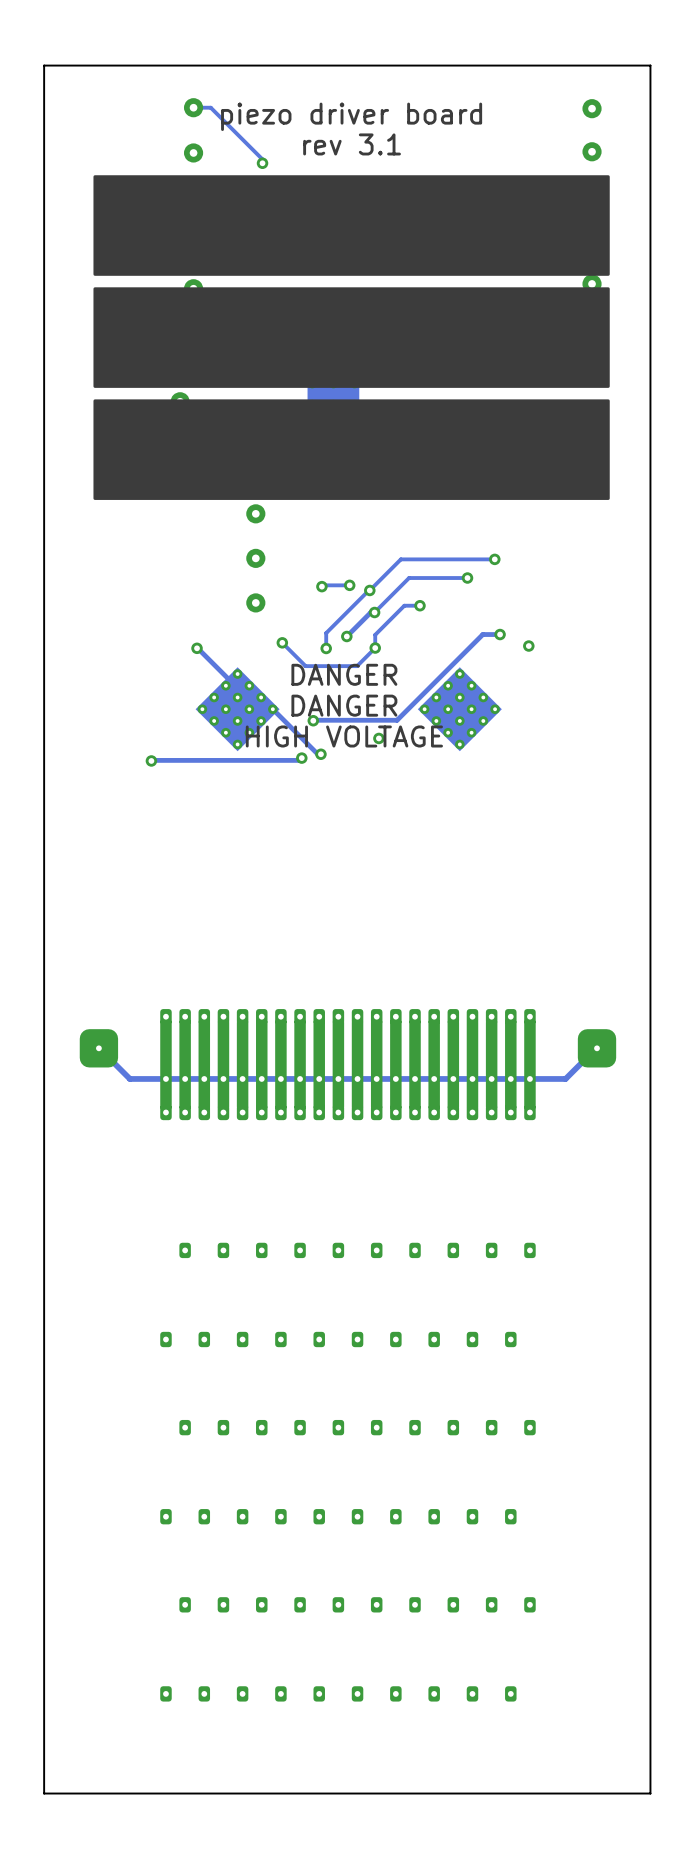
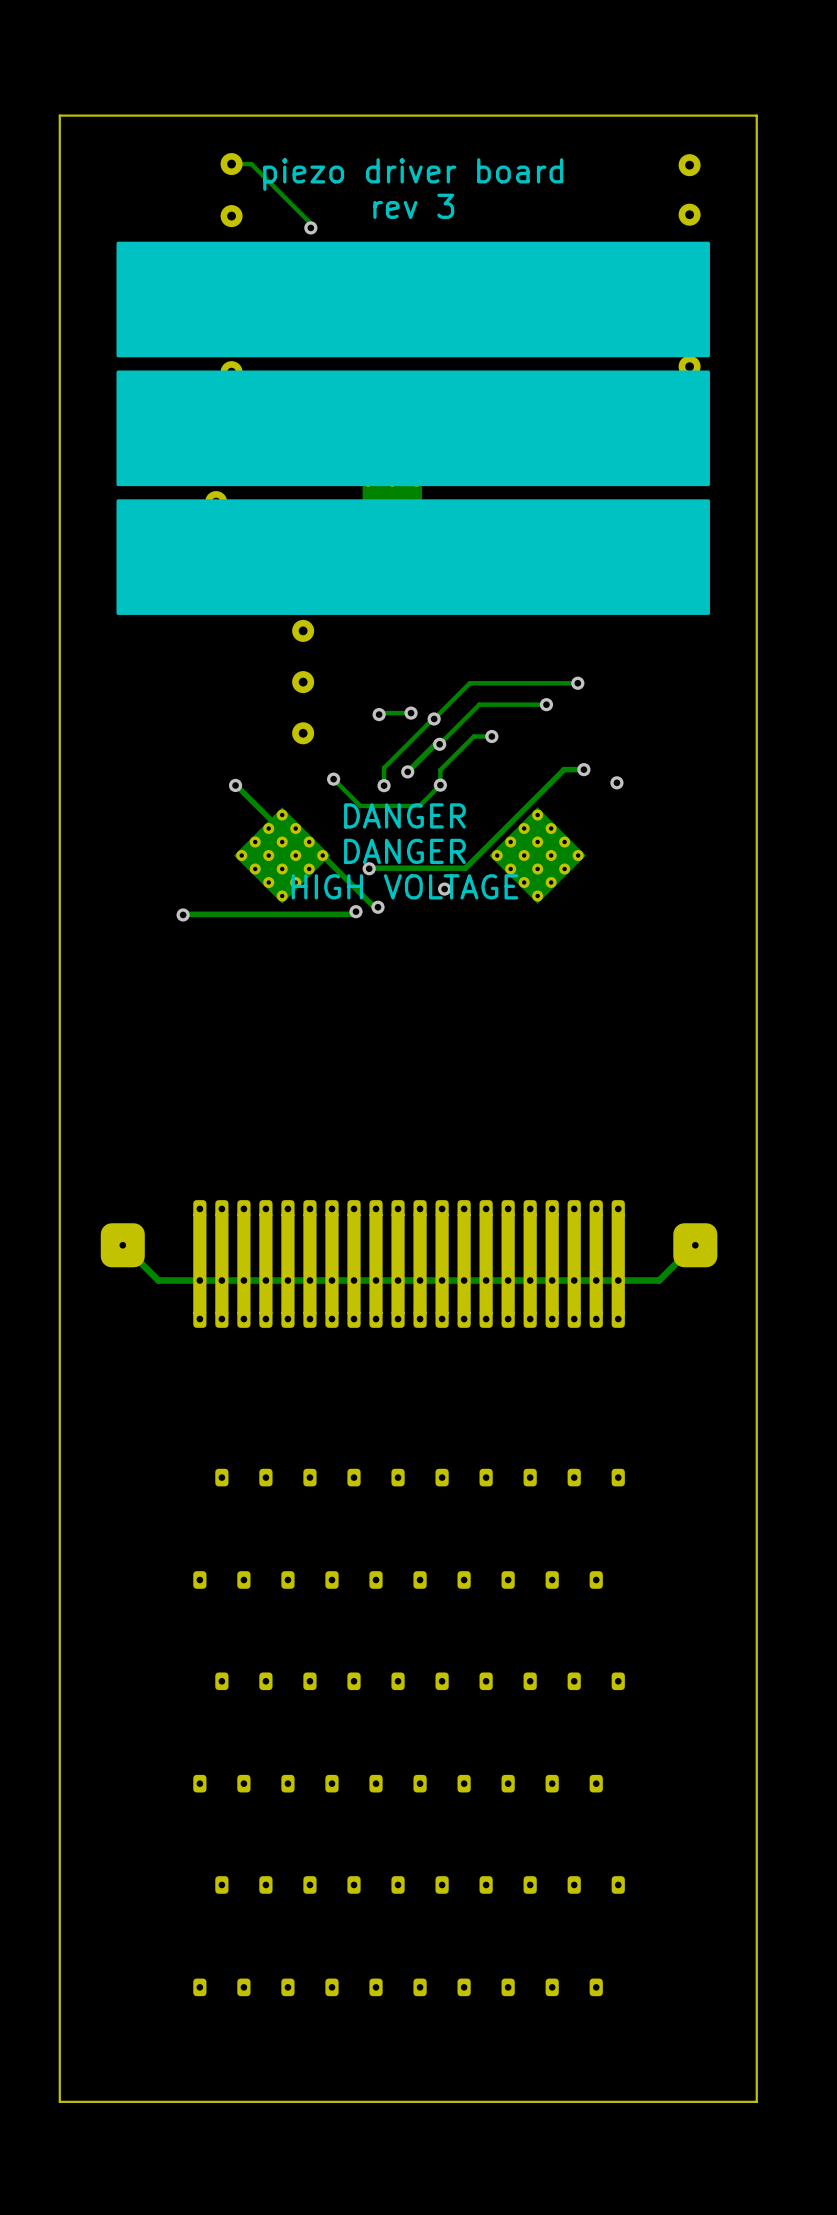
text: rev 3.1 (352, 144) -> rev 3 (413, 206)

